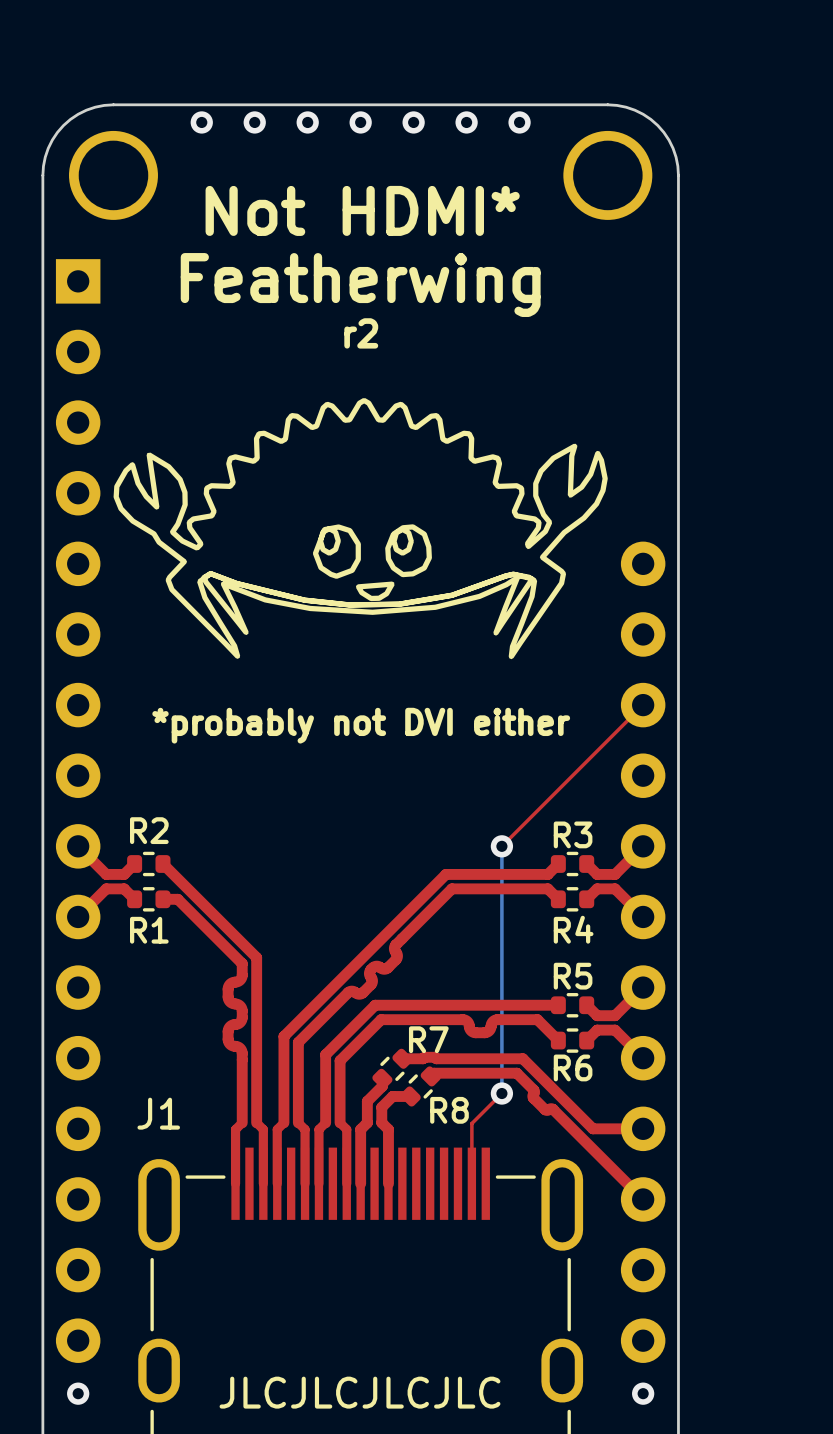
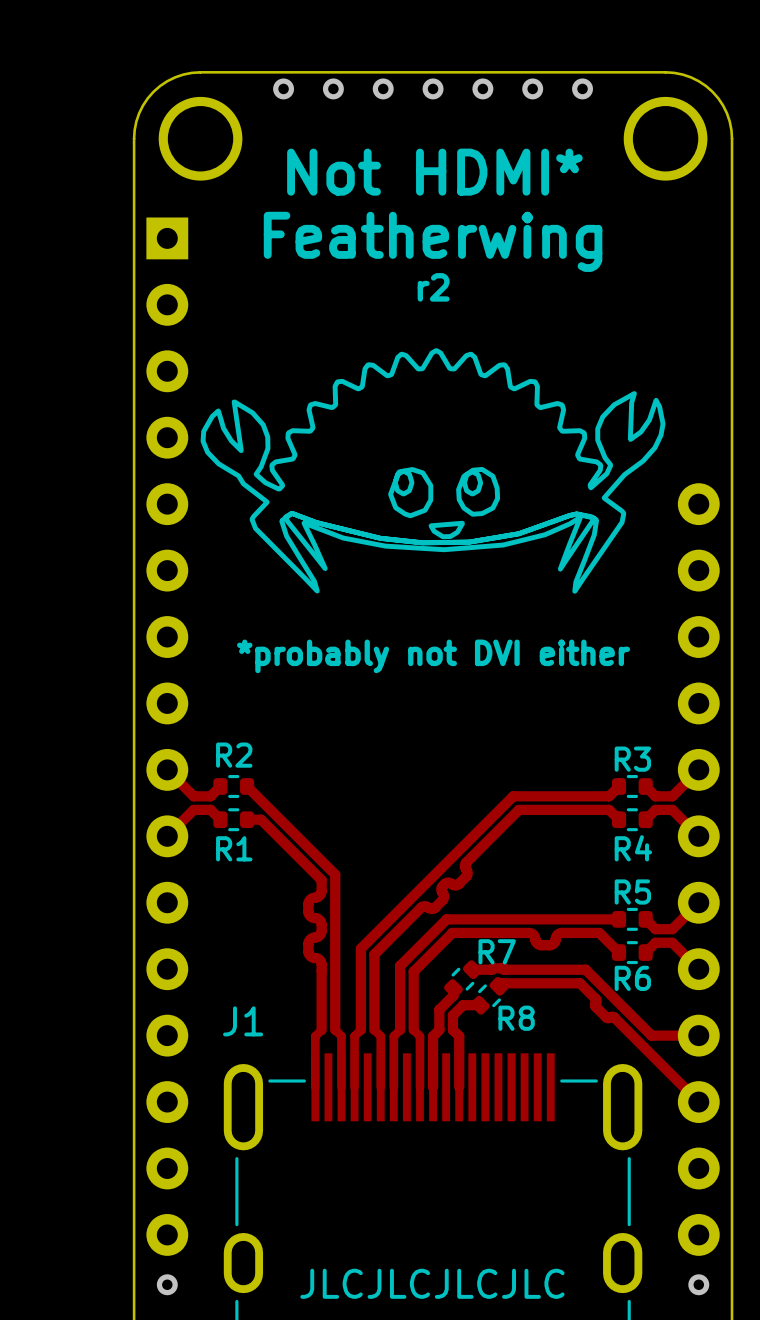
top track: (643, 705) (501, 846) -> none
bottom track: (501, 846) (501, 1093) -> none
via: (501, 846) -> none
top track: (501, 1093) (471, 1123) (471, 1183) -> none
via: (501, 1093) -> none

